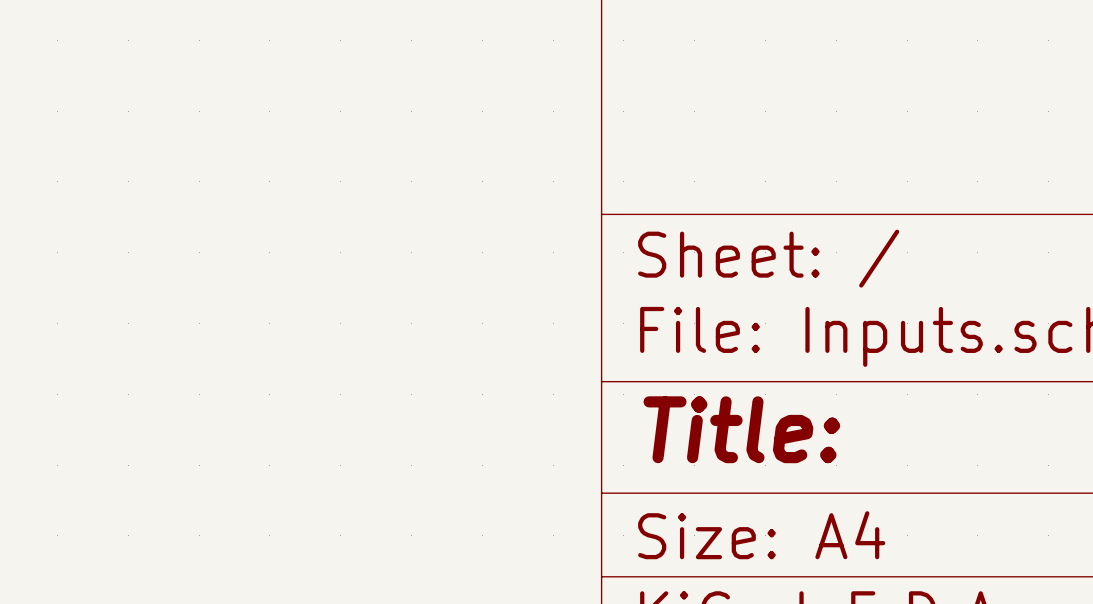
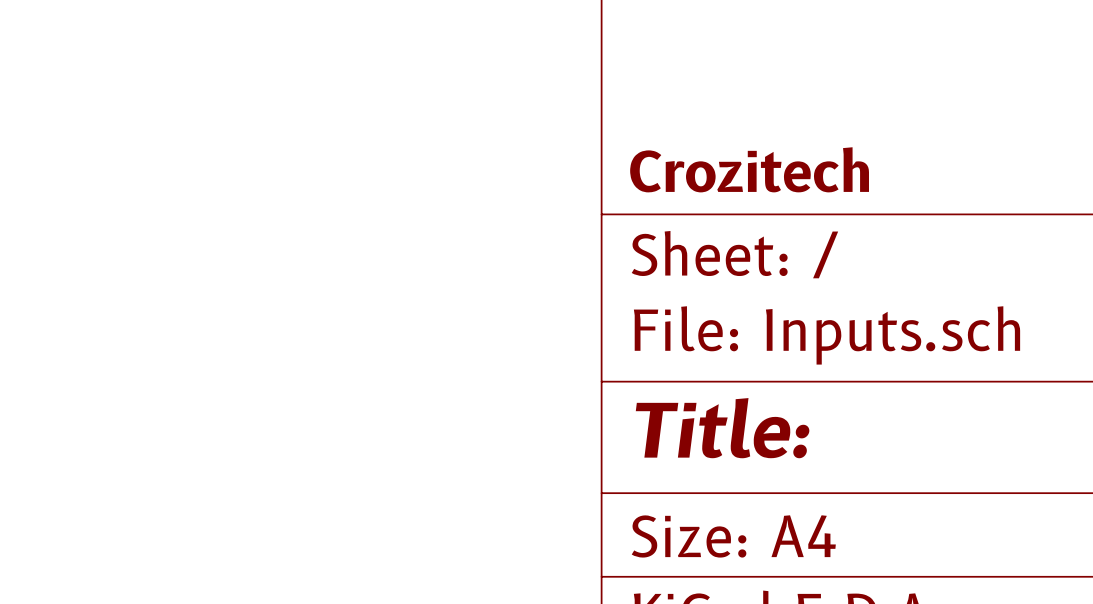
title block: none -> Crozitech (749, 169)

